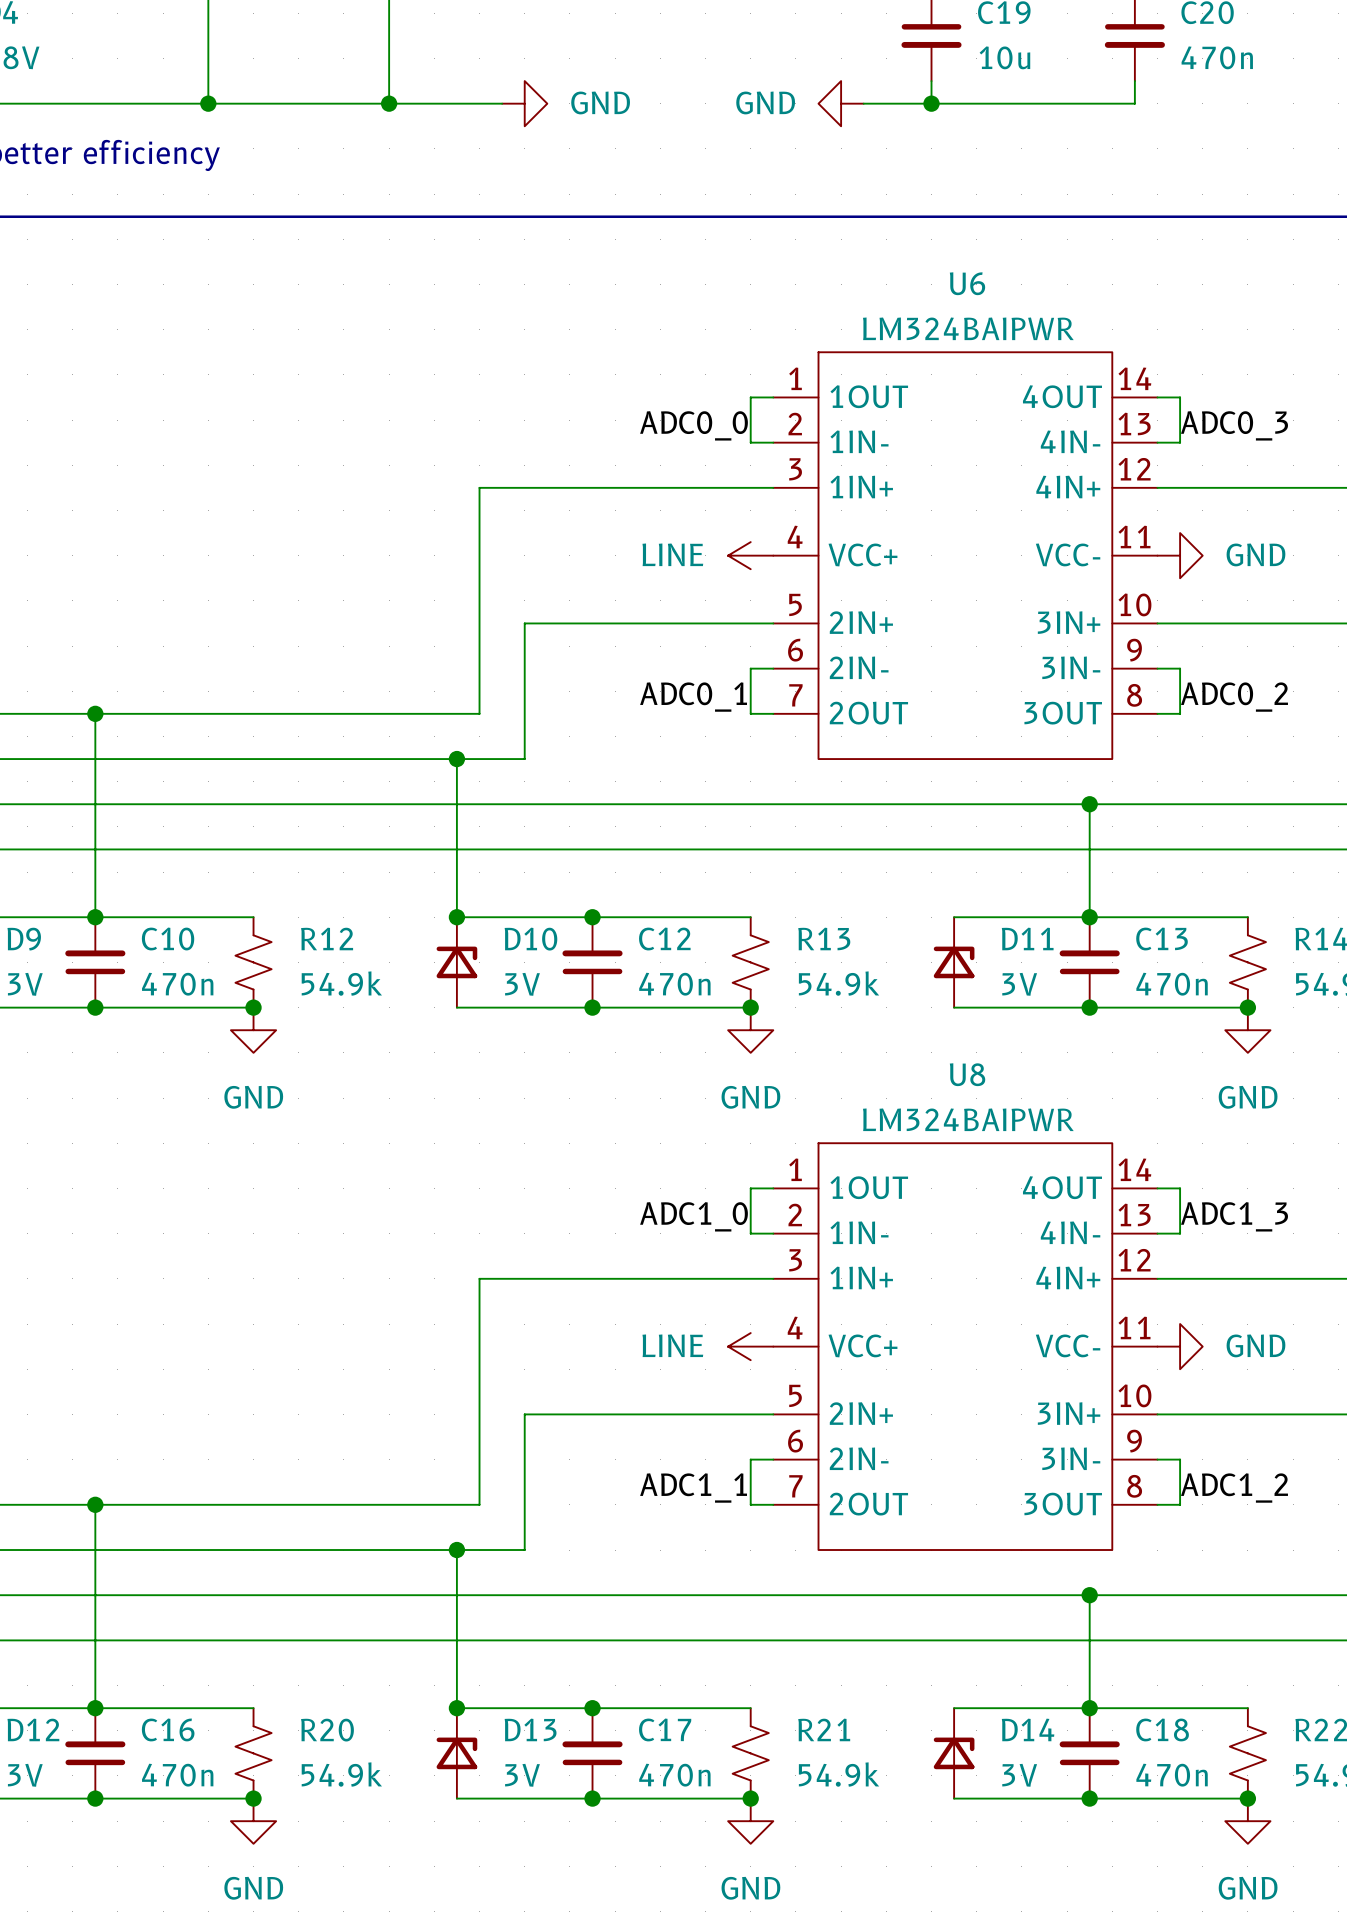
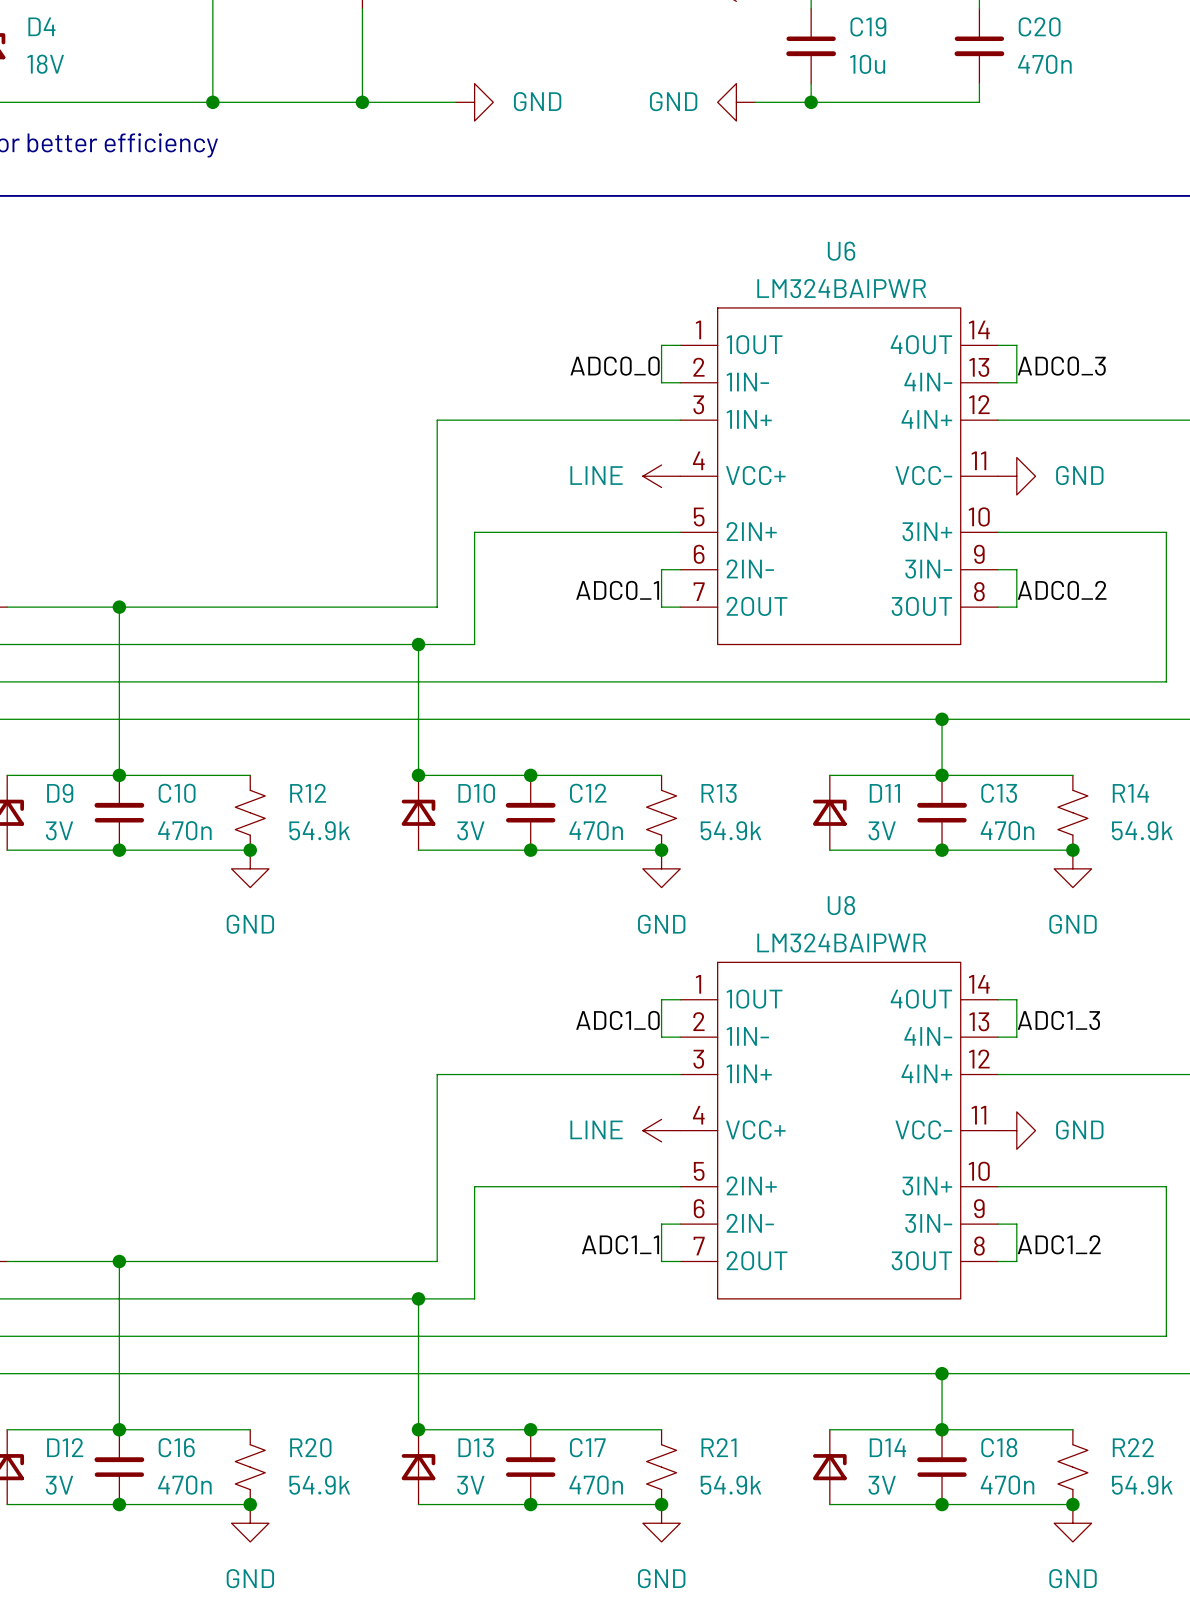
wire: (1089, 804) (1089, 849) -> none
junction position: (1089, 804) -> (942, 719)
wire: (1089, 1595) (1089, 1640) -> none
junction position: (1089, 1595) -> (942, 1373)

